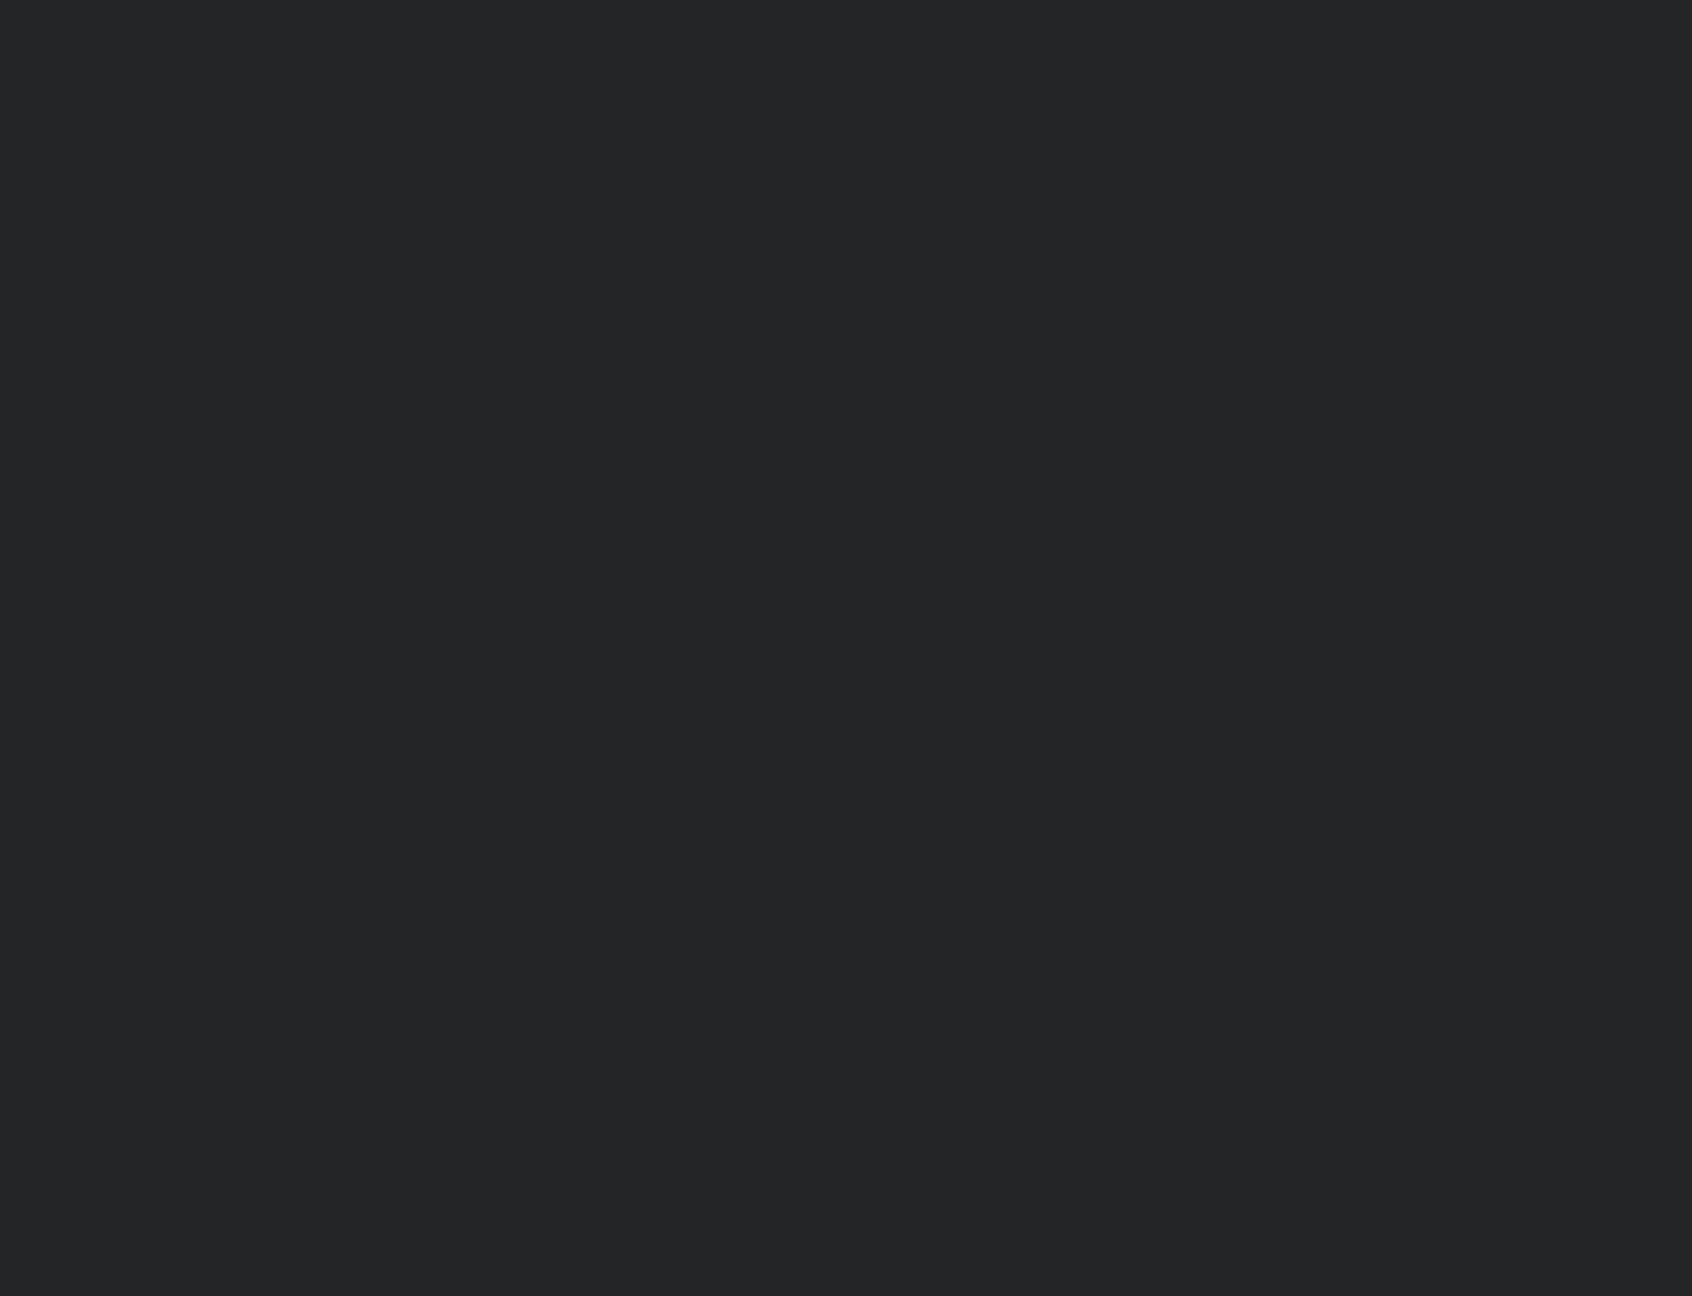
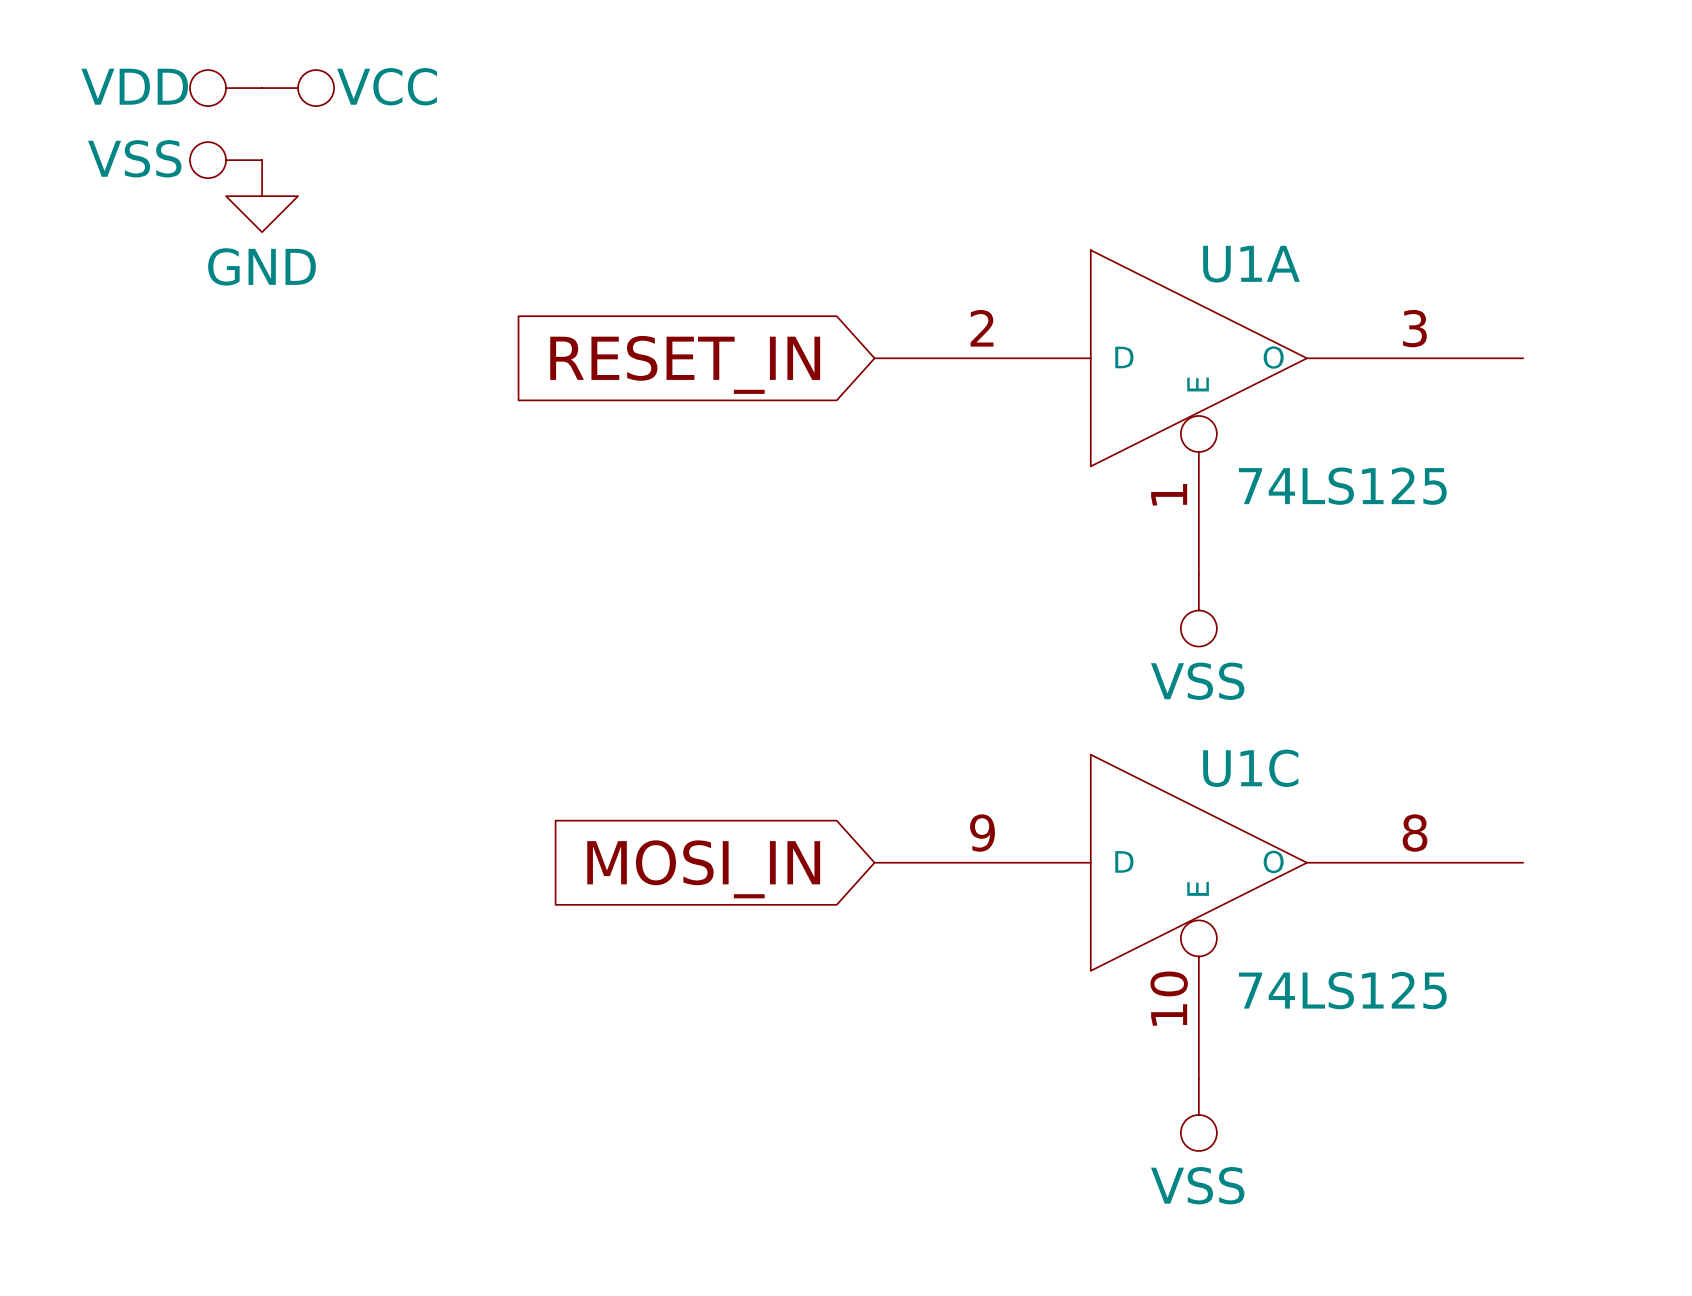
power symbol: none -> VDD (226, 88)
power symbol: none -> VCC (298, 88)
power symbol: none -> VSS (226, 160)
power symbol: none -> GND (262, 196)
global label: none -> RESET_IN (685, 364)
U1A: none -> 74LS125 (1198, 412)
power symbol: none -> VSS (1198, 610)
global label: none -> MOSI_IN (703, 869)
U1C: none -> 74LS125 (1198, 916)
power symbol: none -> VSS (1198, 1114)

